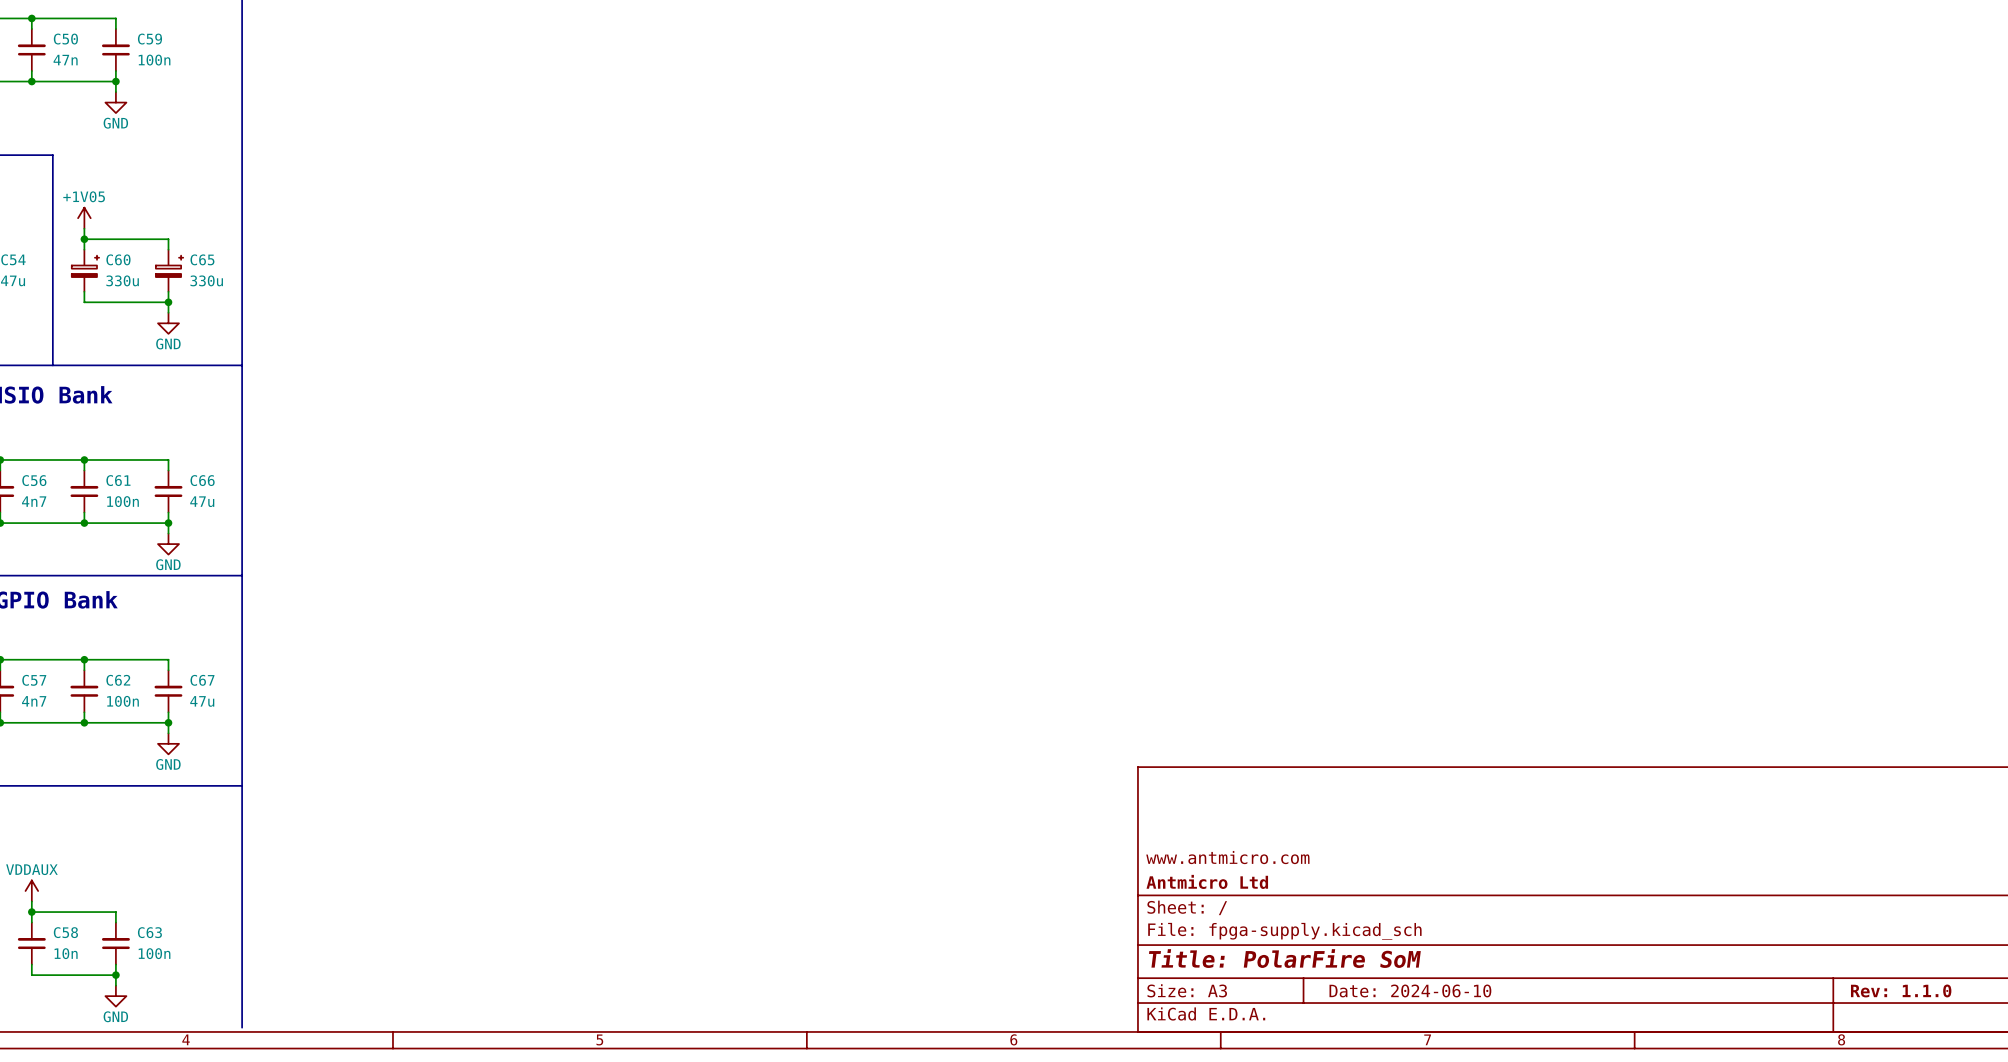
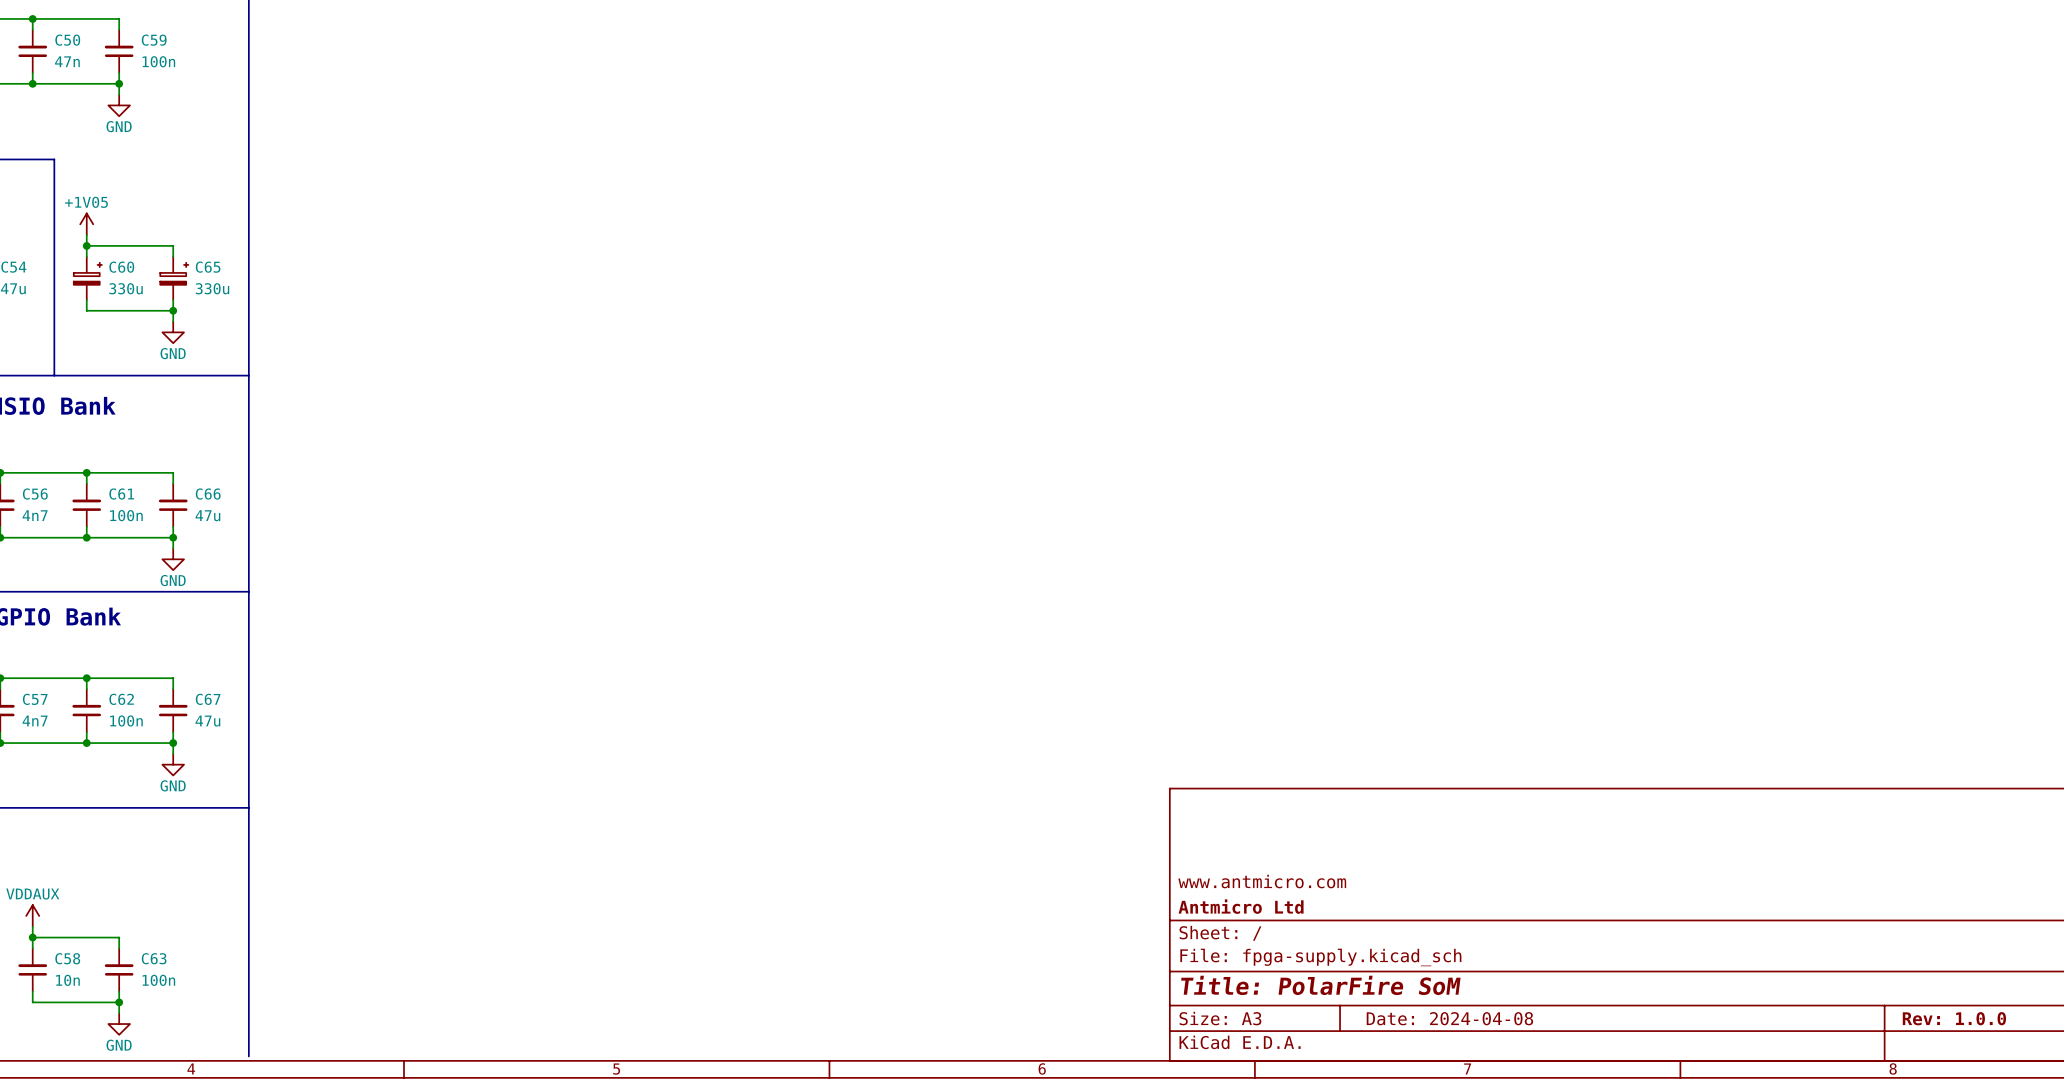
title block: Date: 2024-06-10 (1410, 990) -> Date: 2024-04-08 (1449, 1018)
title block: Rev: 1.1.0 (1901, 990) -> Rev: 1.0.0 (1954, 1018)

